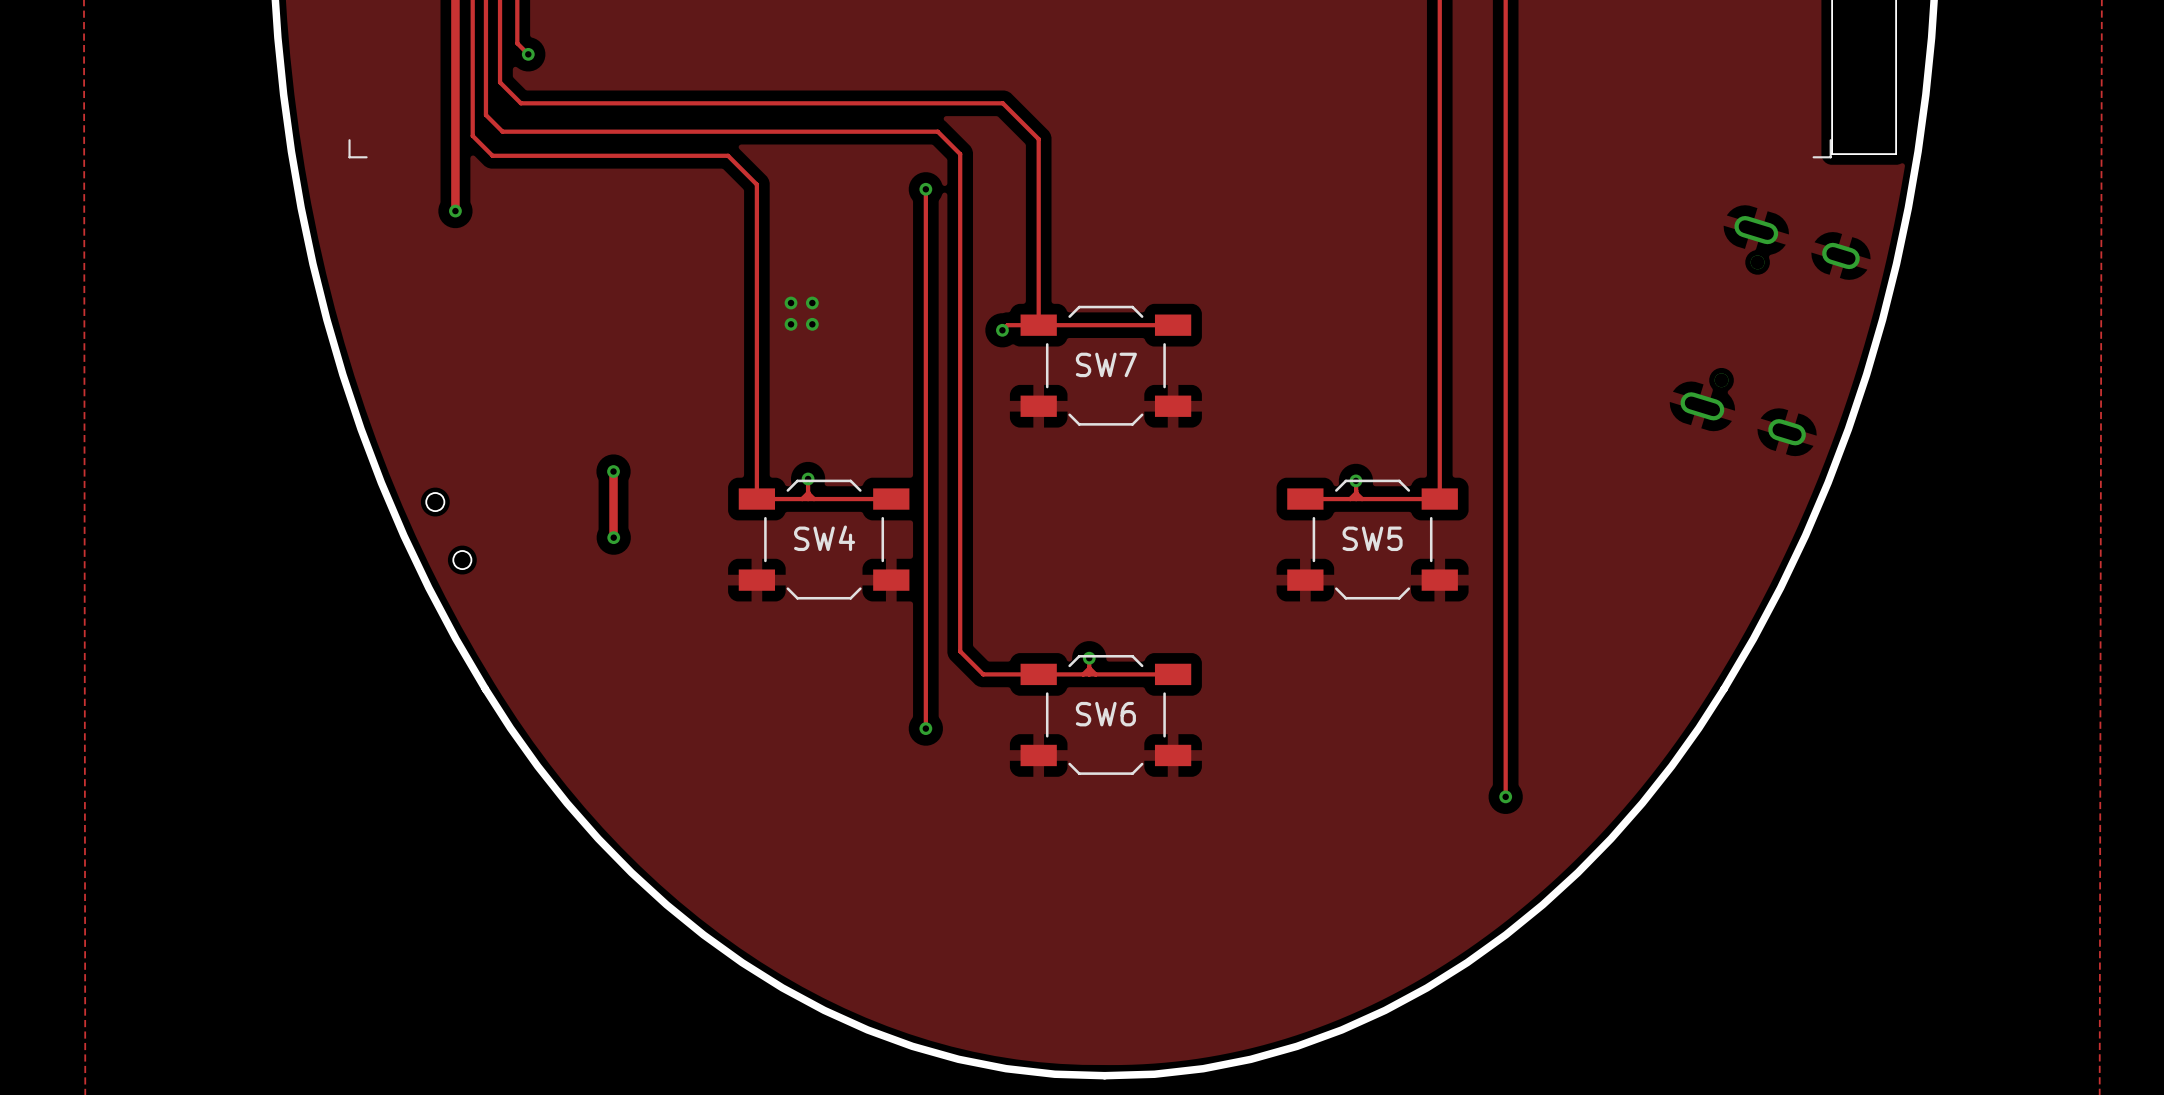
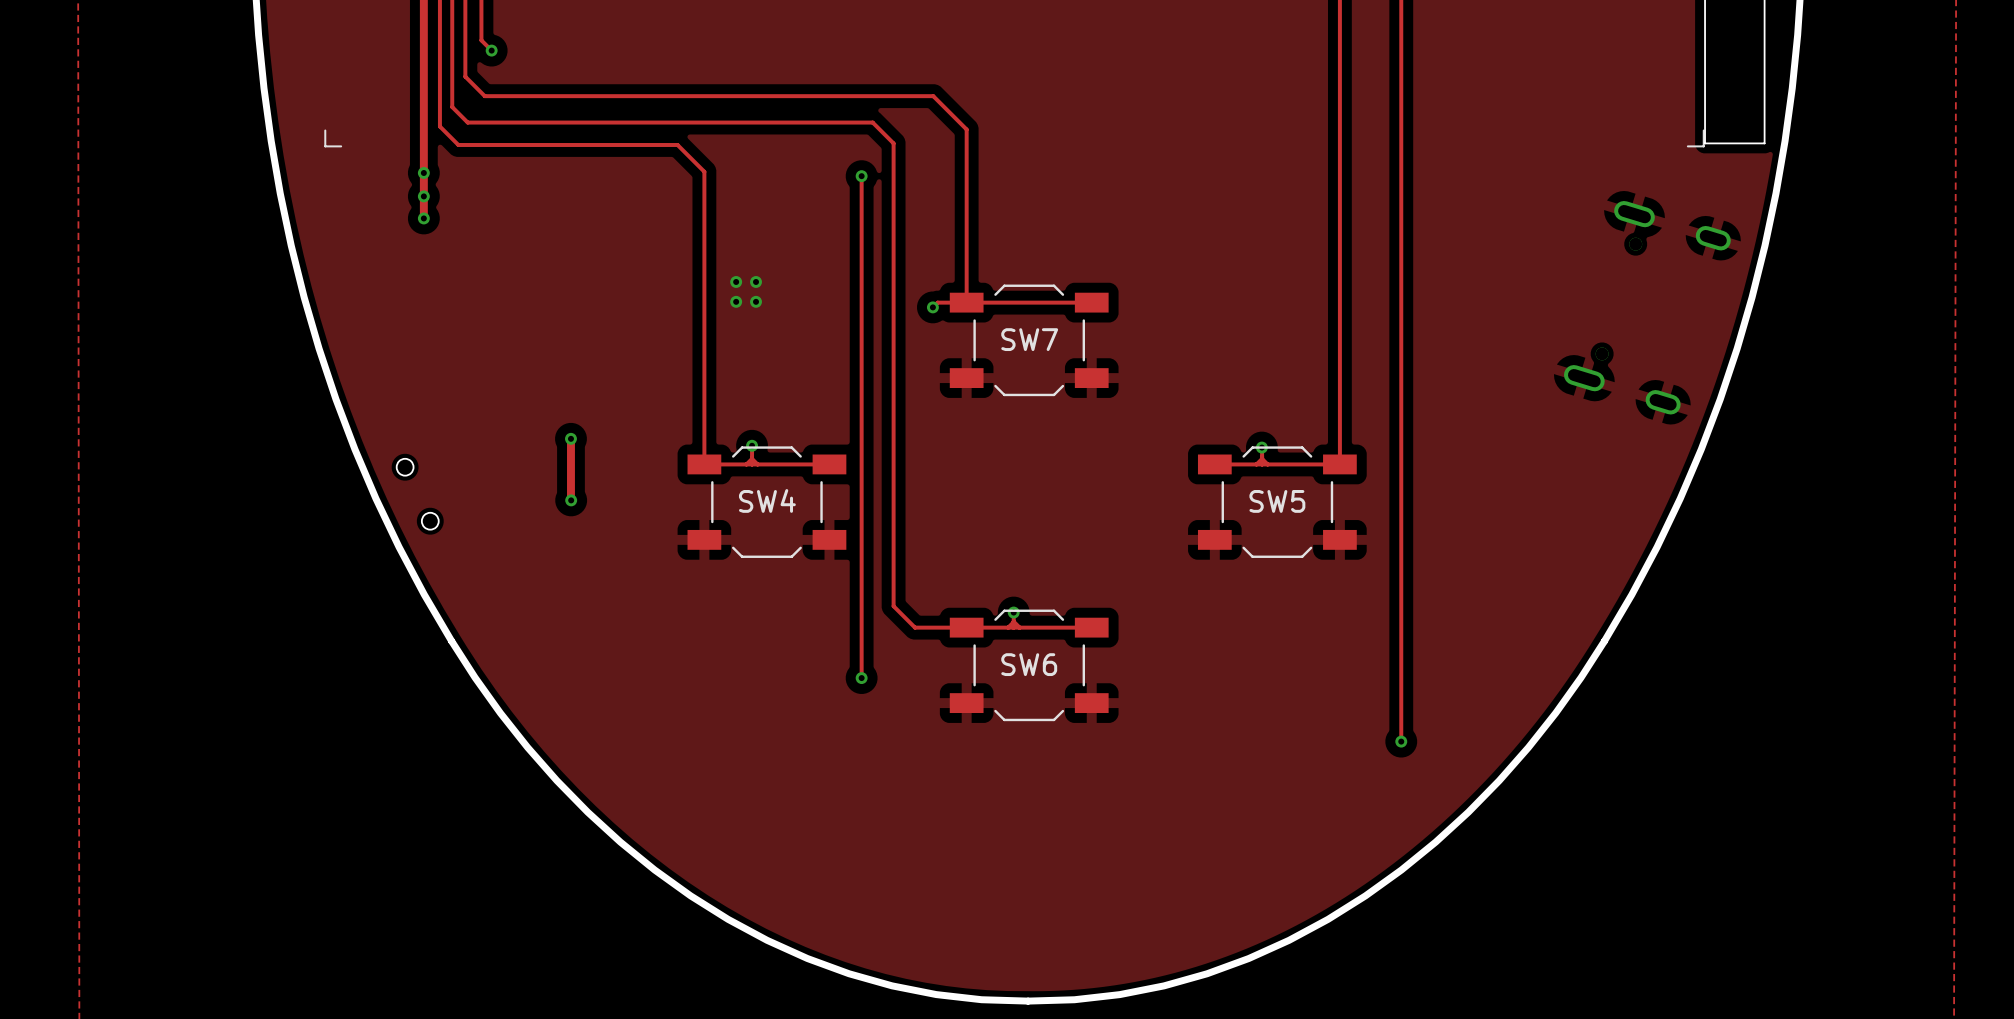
via: none -> (423, 172)
track: none -> (423, 196) (423, 218)
via: none -> (423, 218)

